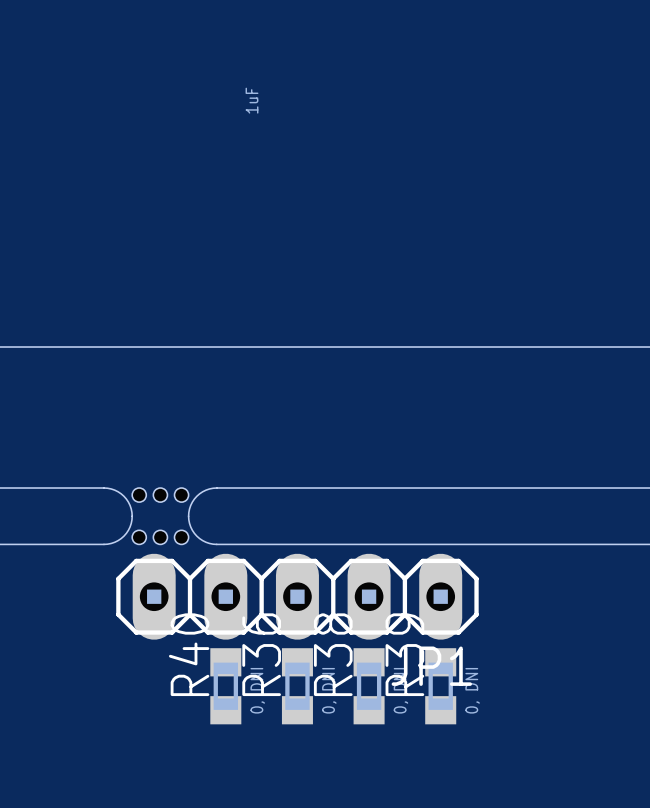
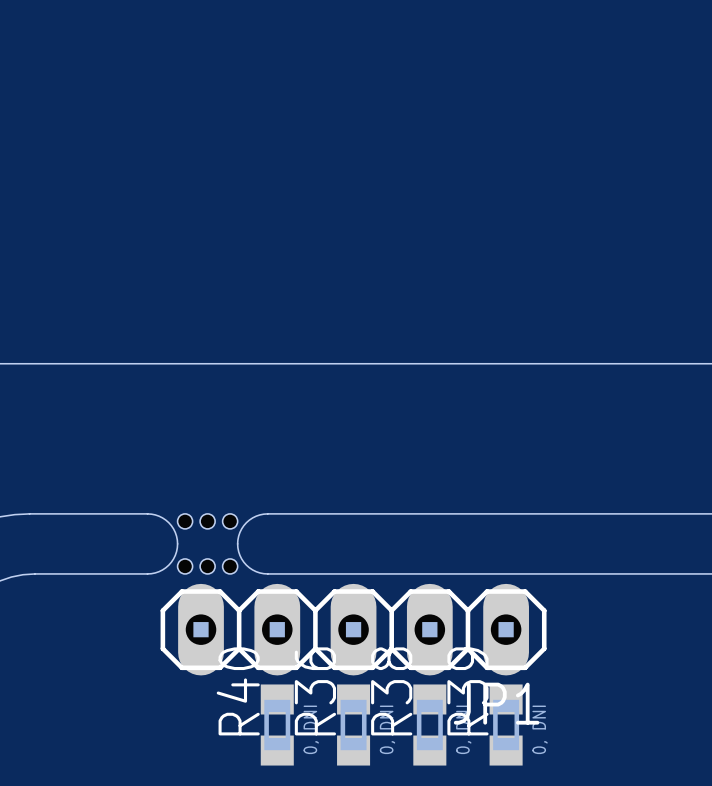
part: 1uF (252, 100) -> none

